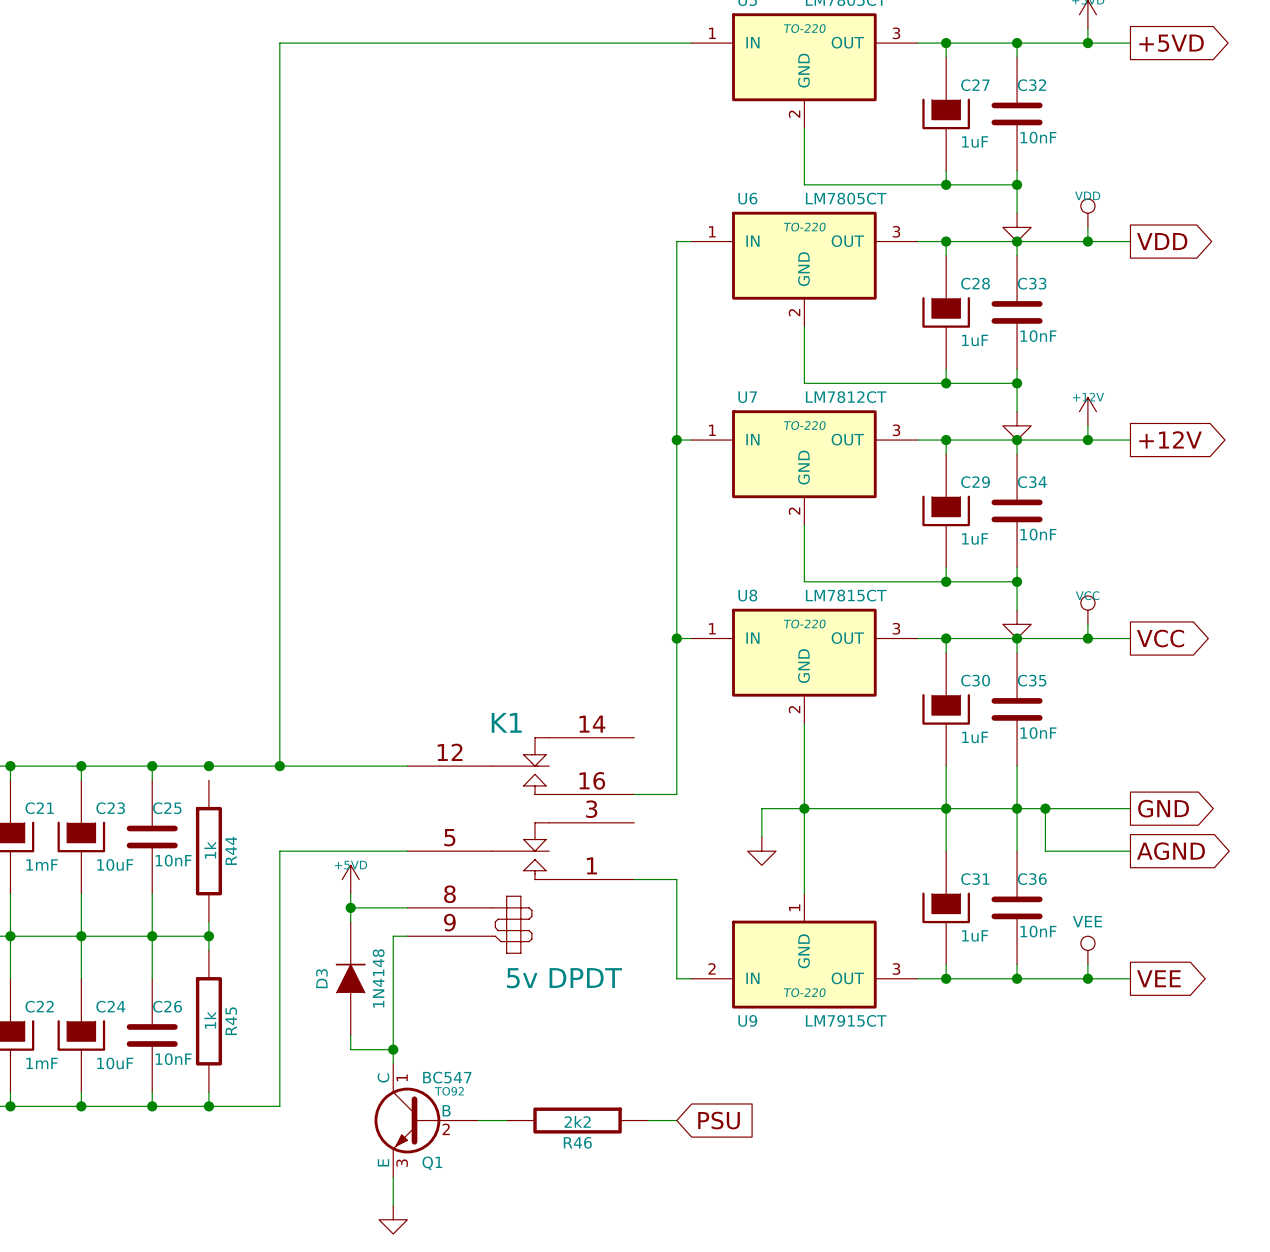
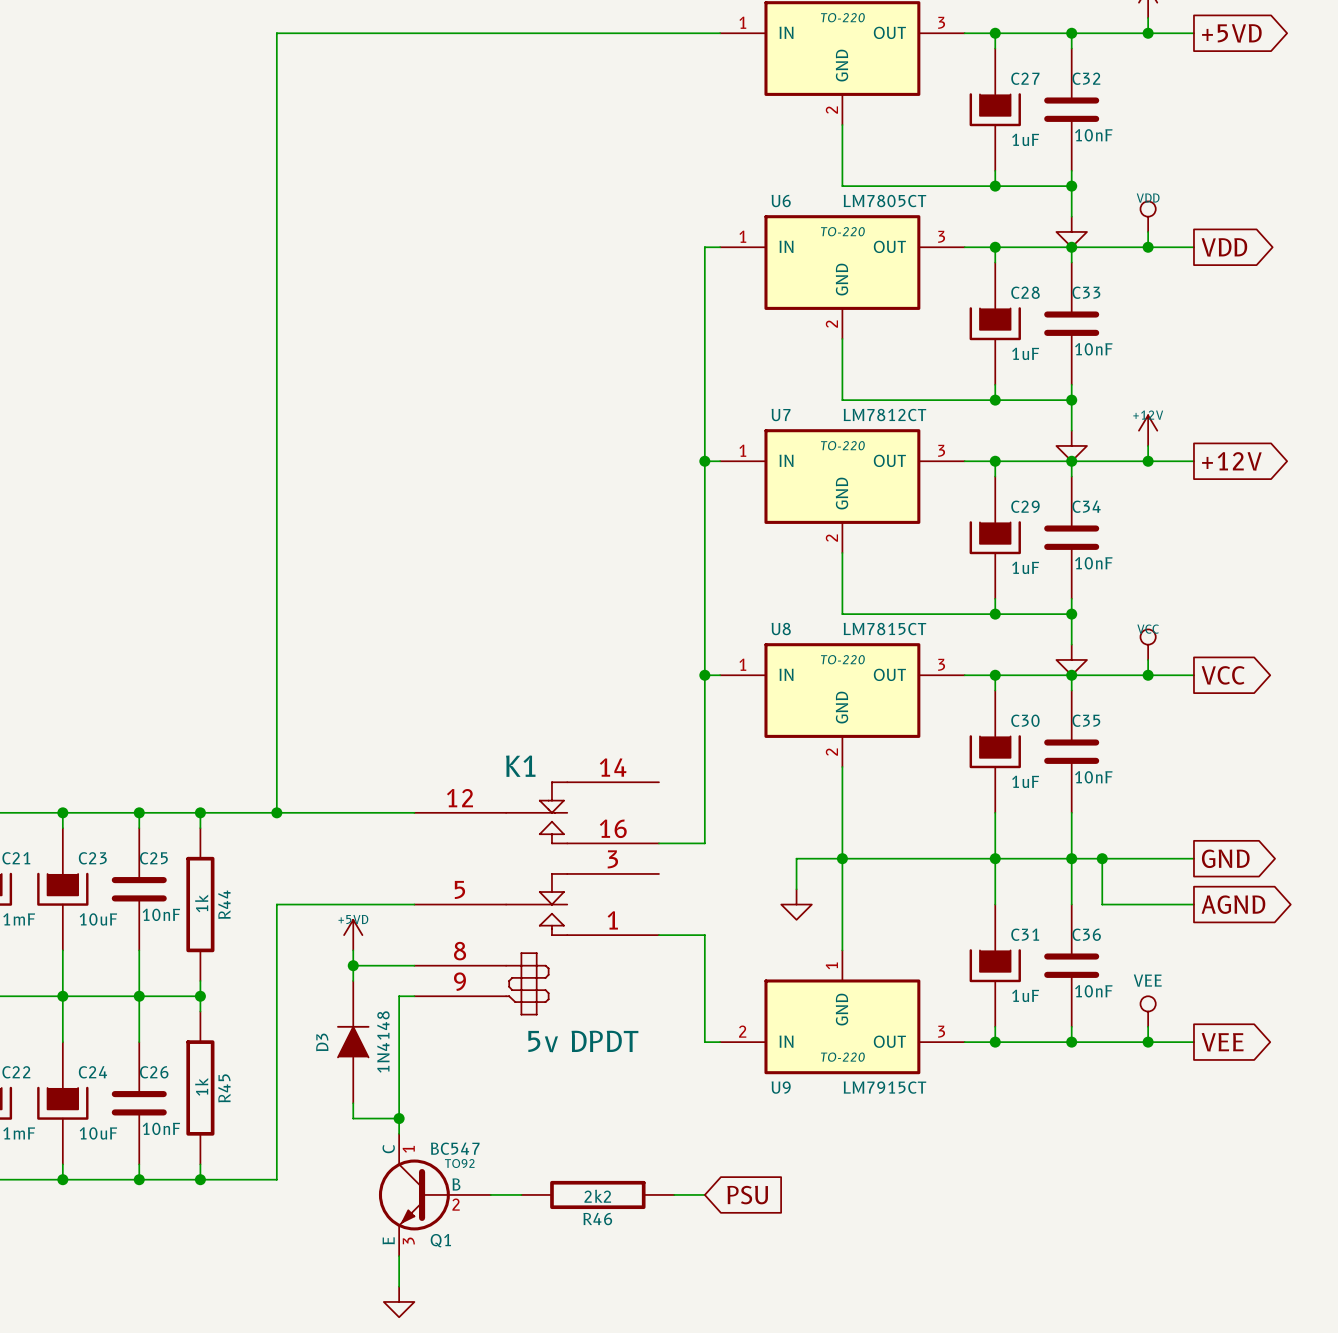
wire: none -> (200, 812) (200, 828)

